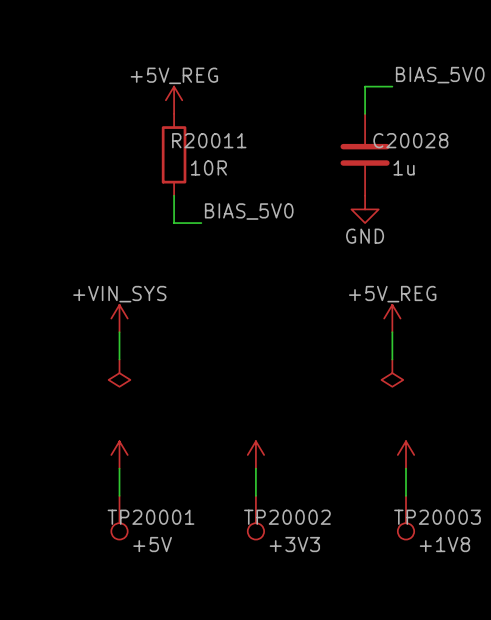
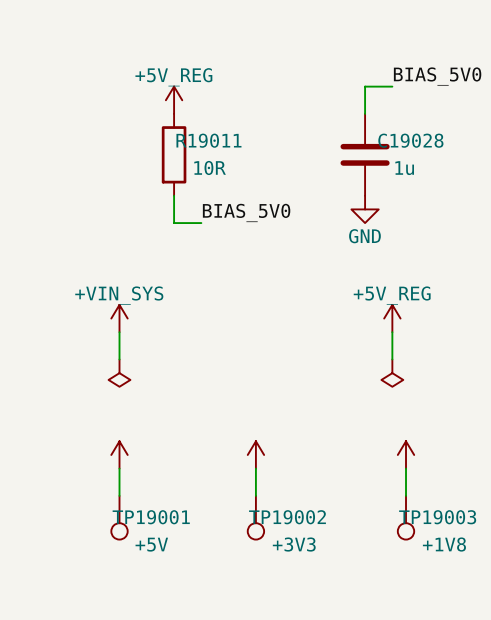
R20011 name: R20011 (209, 140) -> R19011 (208, 140)
C20028 name: C20028 (410, 140) -> C19028 (410, 140)
TP20001 name: TP20001 (150, 517) -> TP19001 (151, 517)
TP20002 name: TP20002 (287, 517) -> TP19002 (287, 517)
TP20003 name: TP20003 (437, 517) -> TP19003 (437, 517)

